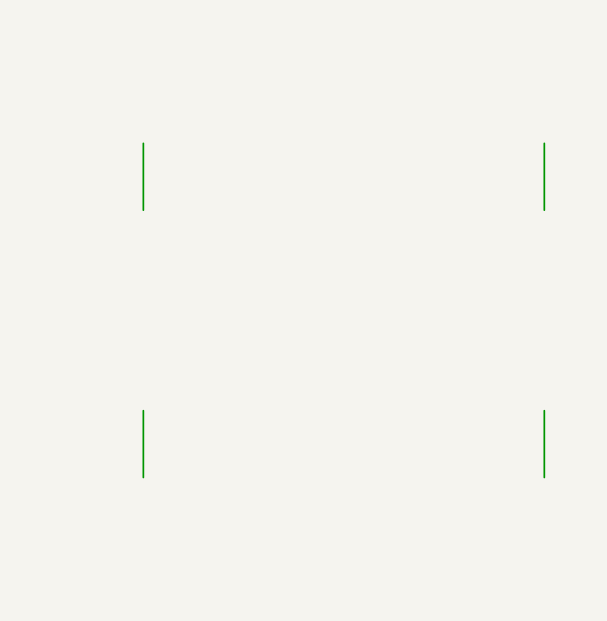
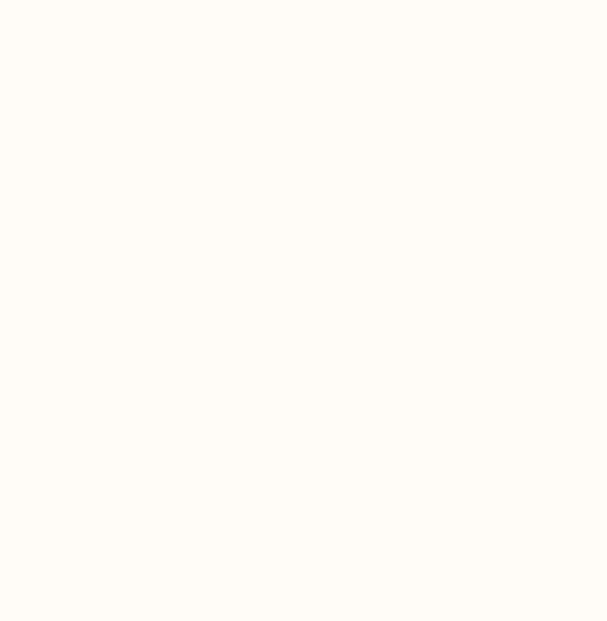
wire: (143, 143) (143, 210) -> none
wire: (544, 143) (544, 210) -> none
wire: (143, 410) (143, 477) -> none
wire: (544, 410) (544, 477) -> none

